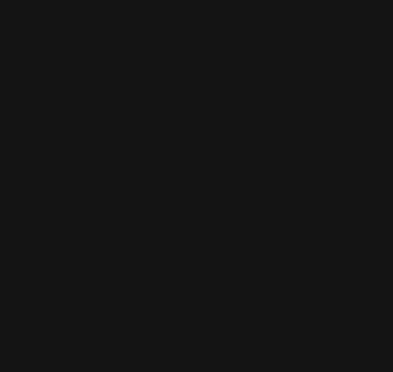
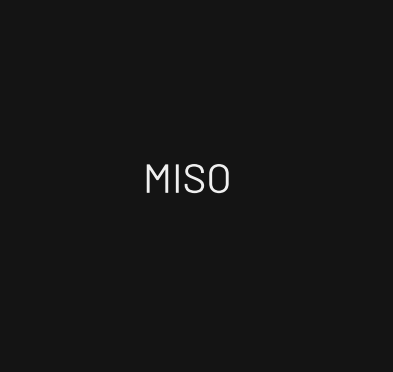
text: none -> MISO (187, 178)

